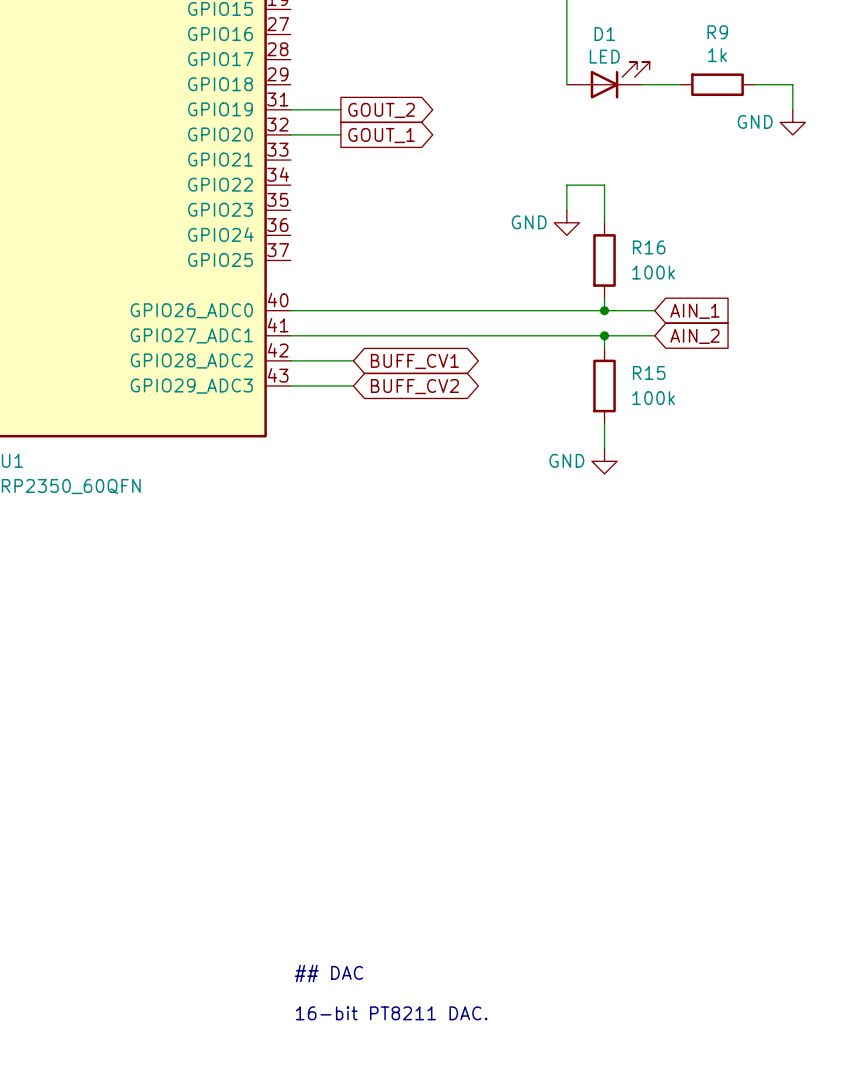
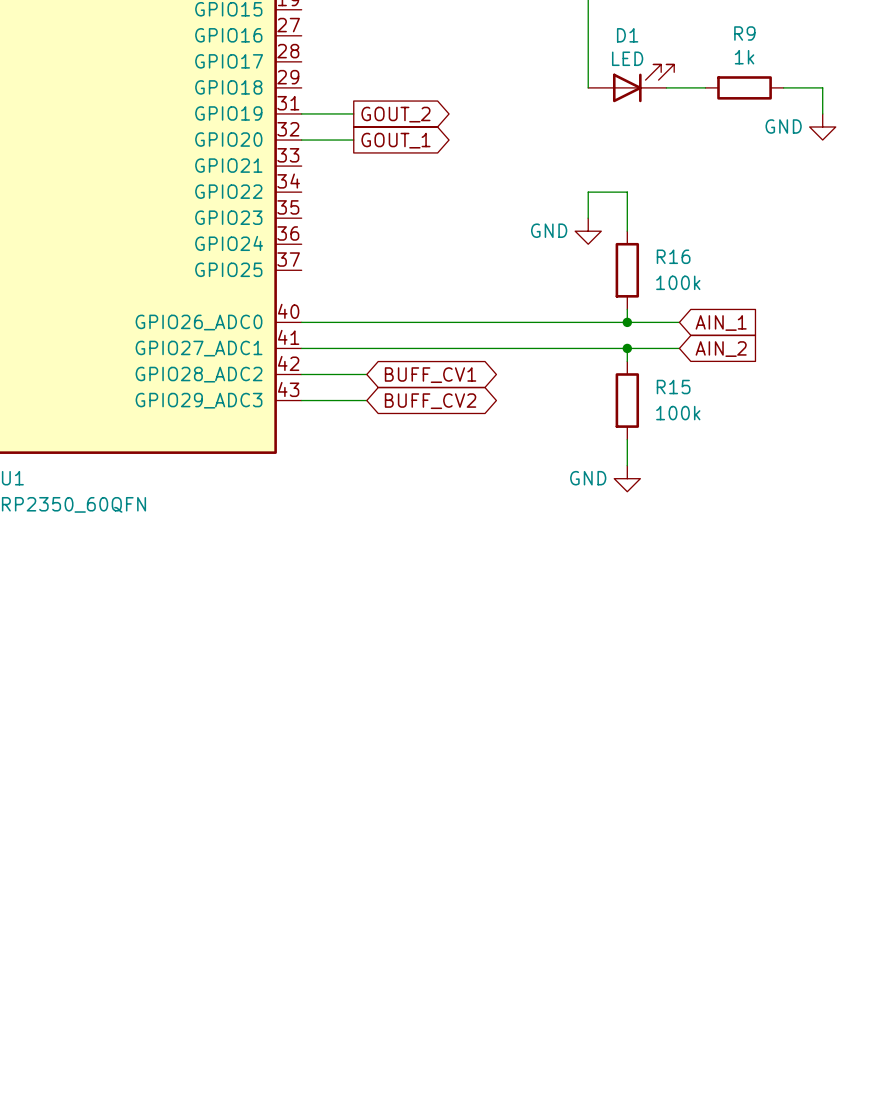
text: ## DAC (328, 973) -> none
text: 16-bit PT8211 DAC. (391, 1013) -> none

